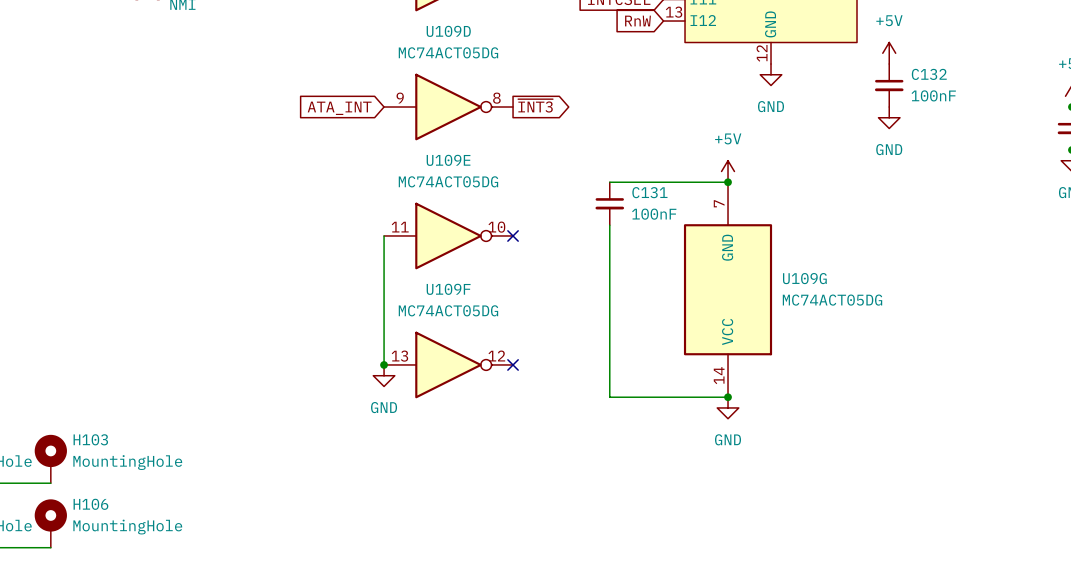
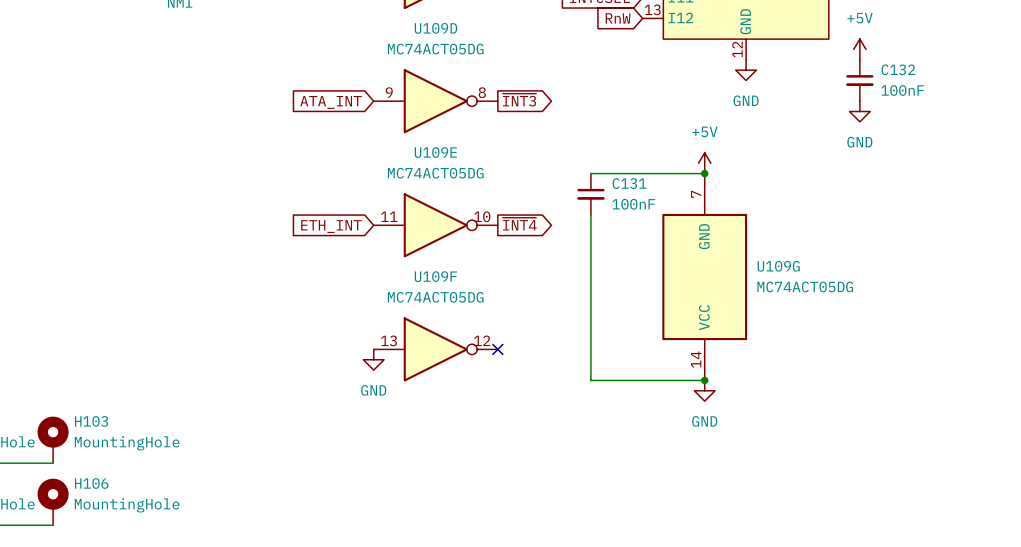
global label: none -> ~{INT4} (519, 224)
wire: (384, 235) (384, 364) -> none
no-connect mark: (513, 235) -> none
global label: none -> ETH_INT (331, 226)
junction: (384, 364) -> none

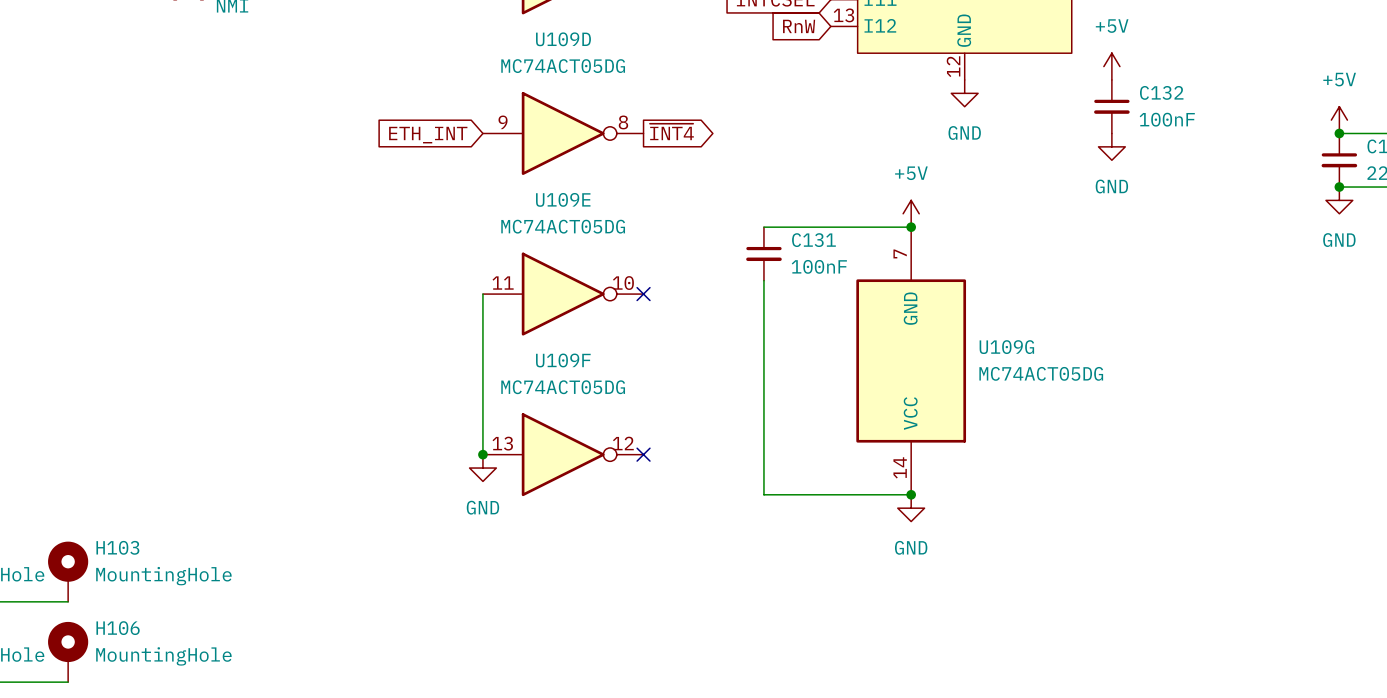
global label: ~{INT3} (519, 100) -> ~{INT4} (671, 131)
global label: ATA_INT (331, 102) -> ETH_INT (428, 135)
global label: ~{INT4} (519, 224) -> none
wire: none -> (482, 294) (482, 454)
no-connect mark: none -> (643, 294)
global label: ETH_INT (331, 226) -> none
junction: none -> (482, 454)

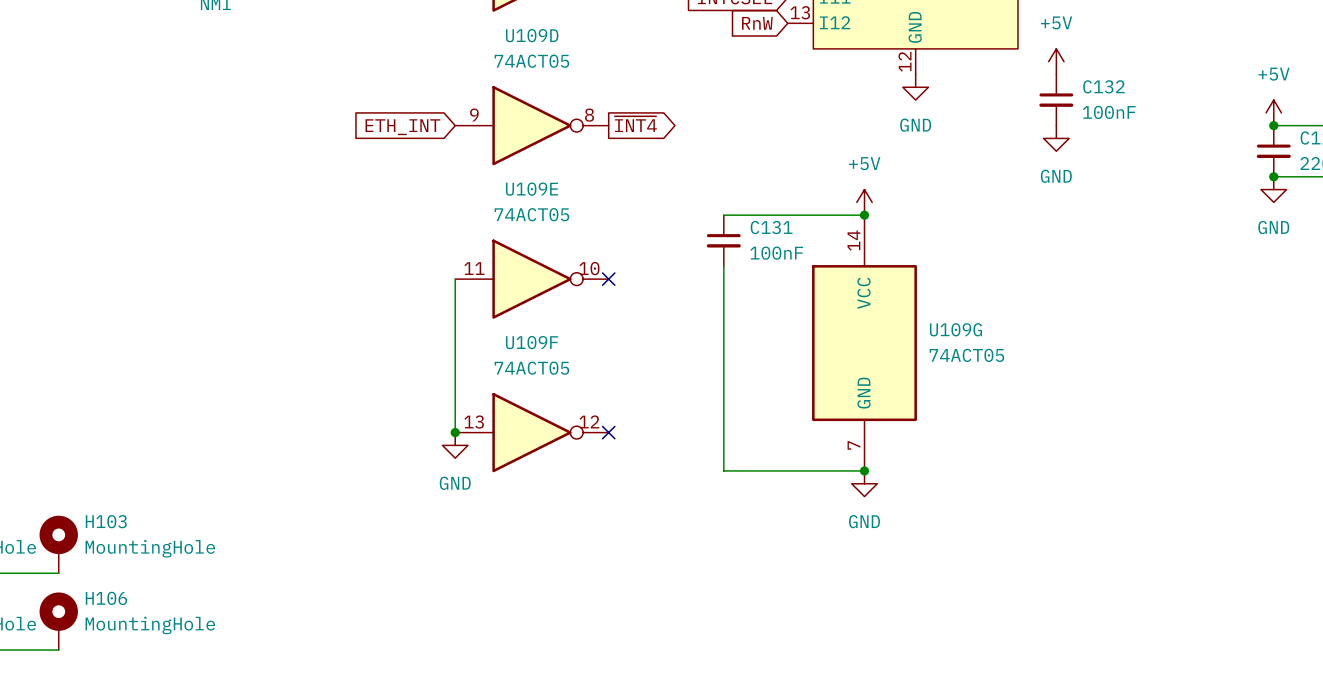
U109D value: MC74ACT05DG (563, 66) -> 74ACT05 (531, 61)
U109E value: MC74ACT05DG (563, 226) -> 74ACT05 (531, 214)
U109G rotation: 0° (911, 360) -> 180° (864, 343)
U109G value: MC74ACT05DG (1041, 373) -> 74ACT05 (966, 355)
U109F value: MC74ACT05DG (563, 387) -> 74ACT05 (531, 368)

